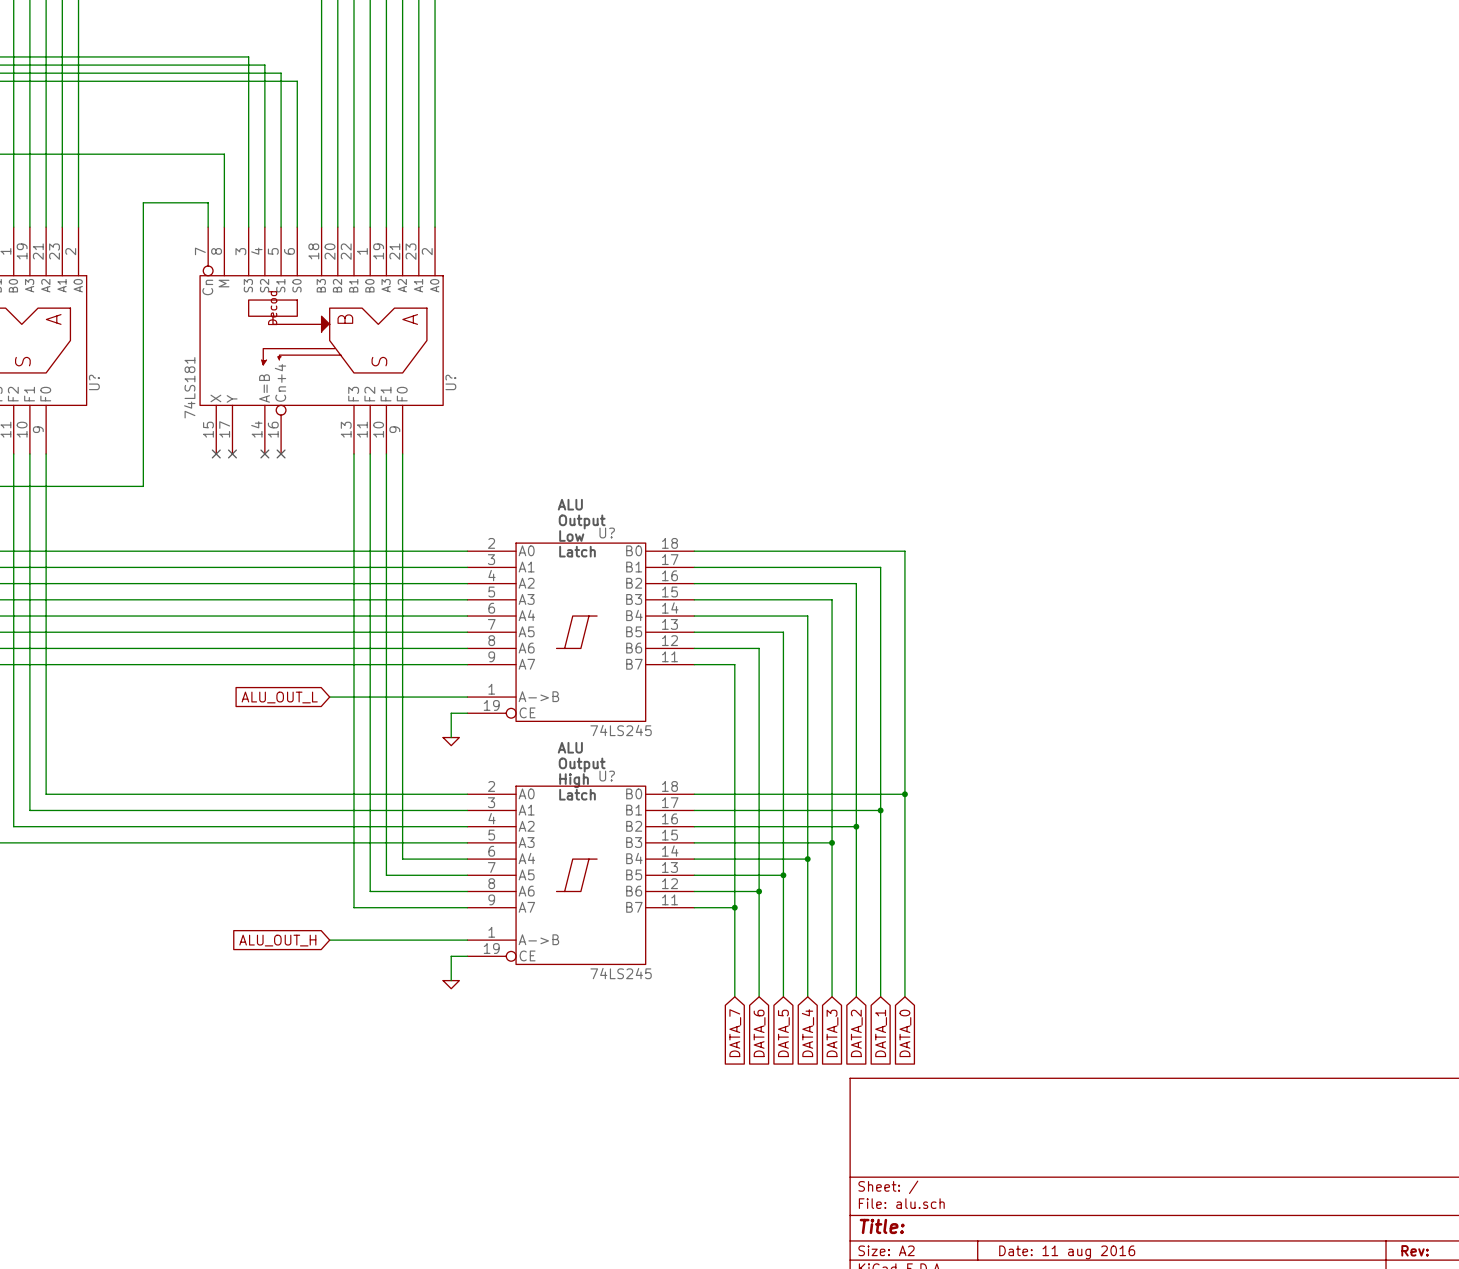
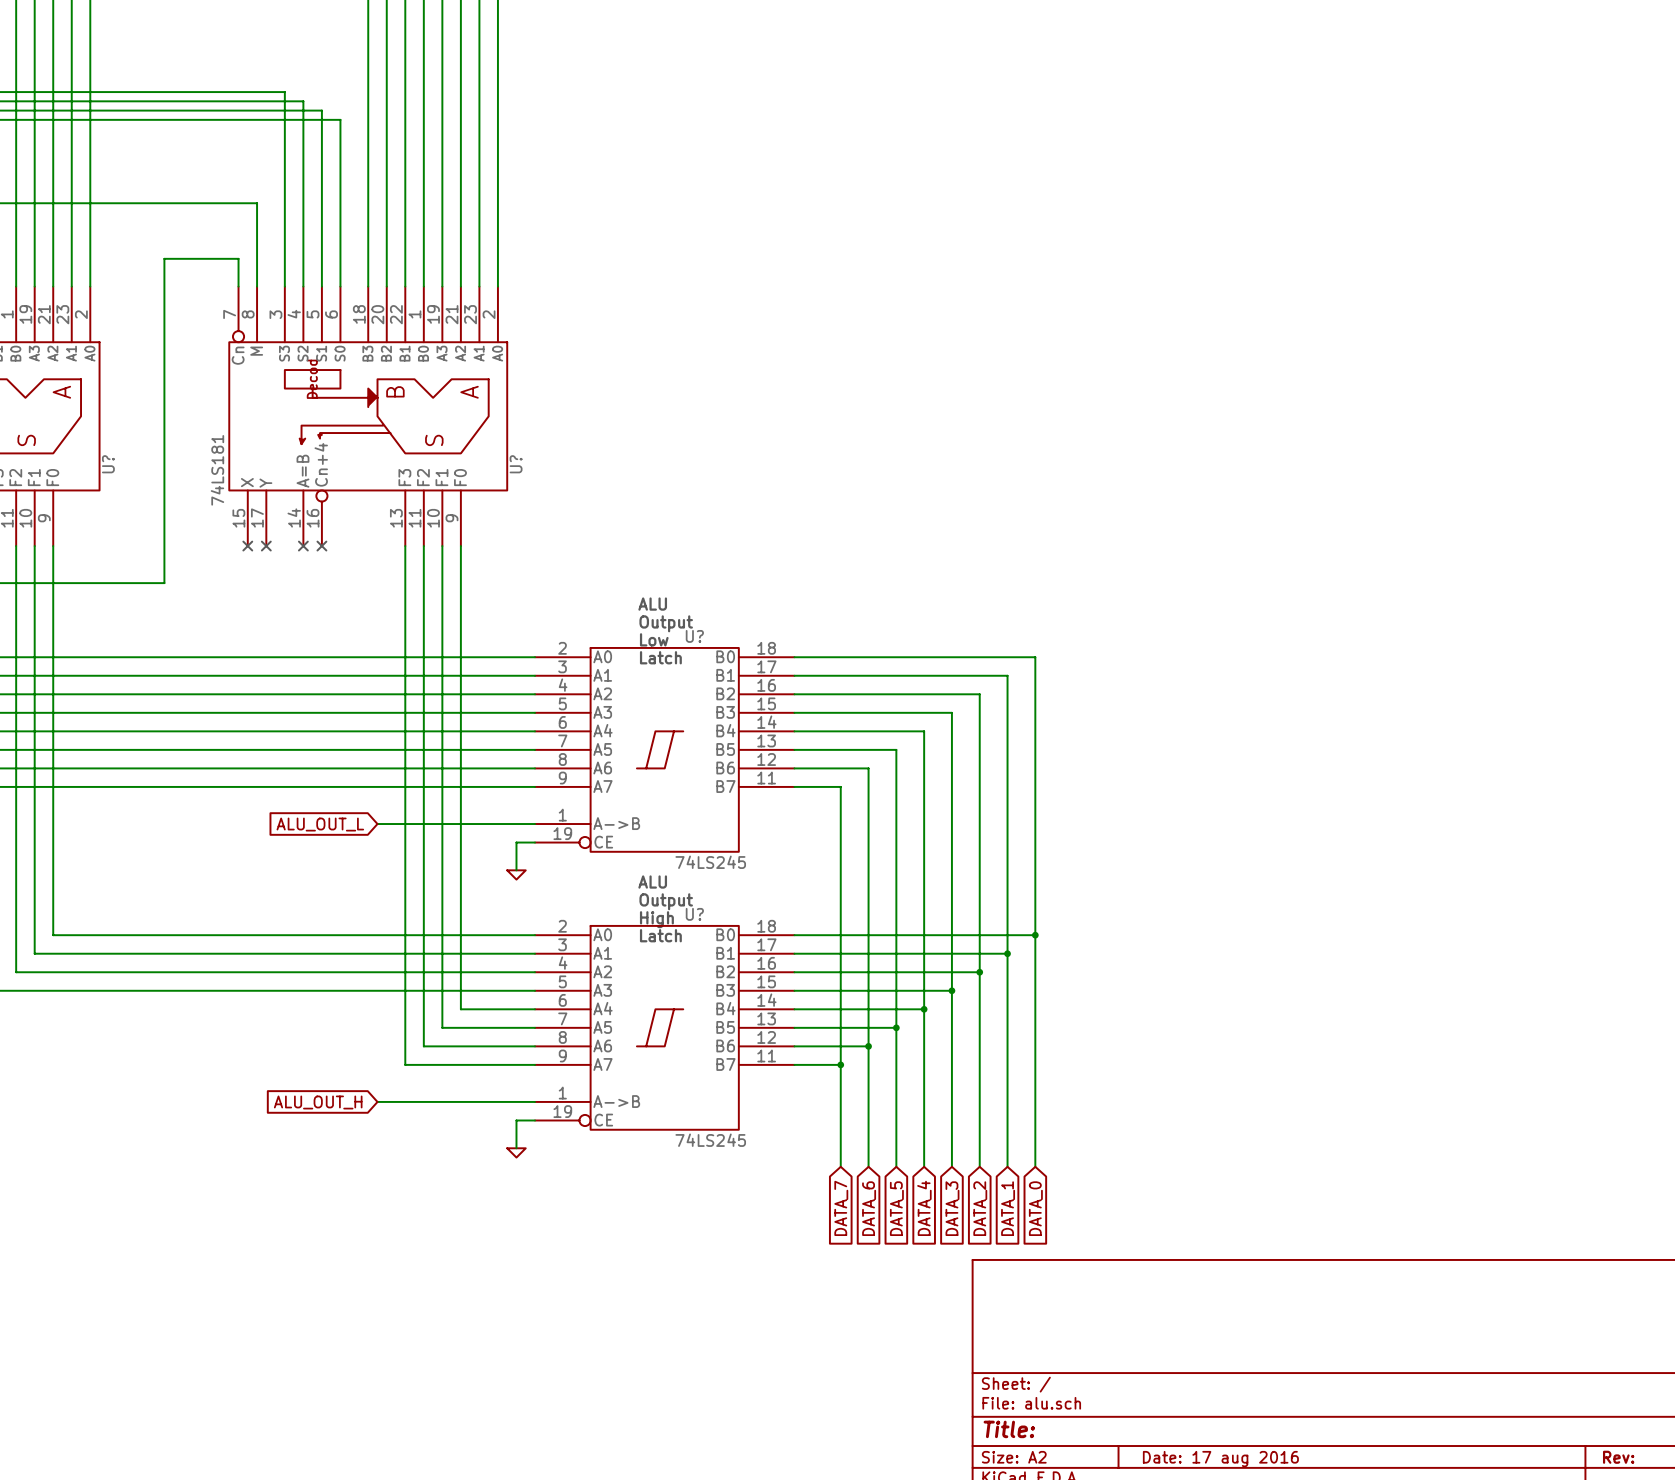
title block: Date: 11 aug 2016 (1067, 1252) -> Date: 17 aug 2016 (1220, 1459)

